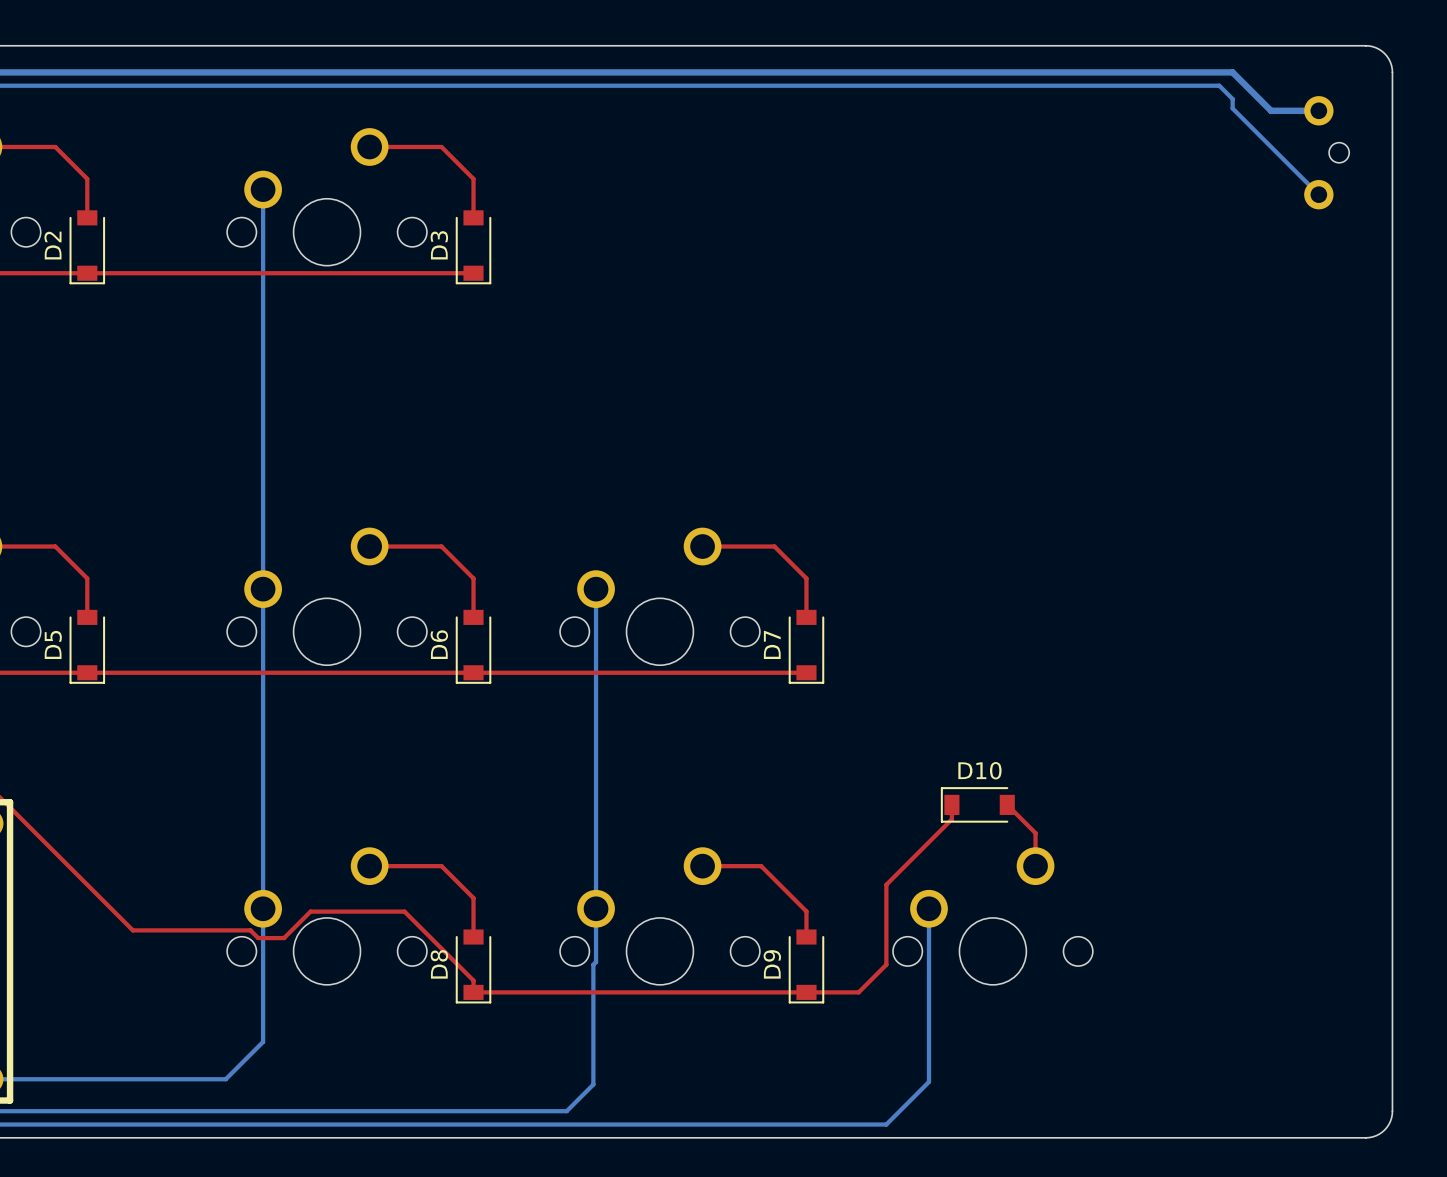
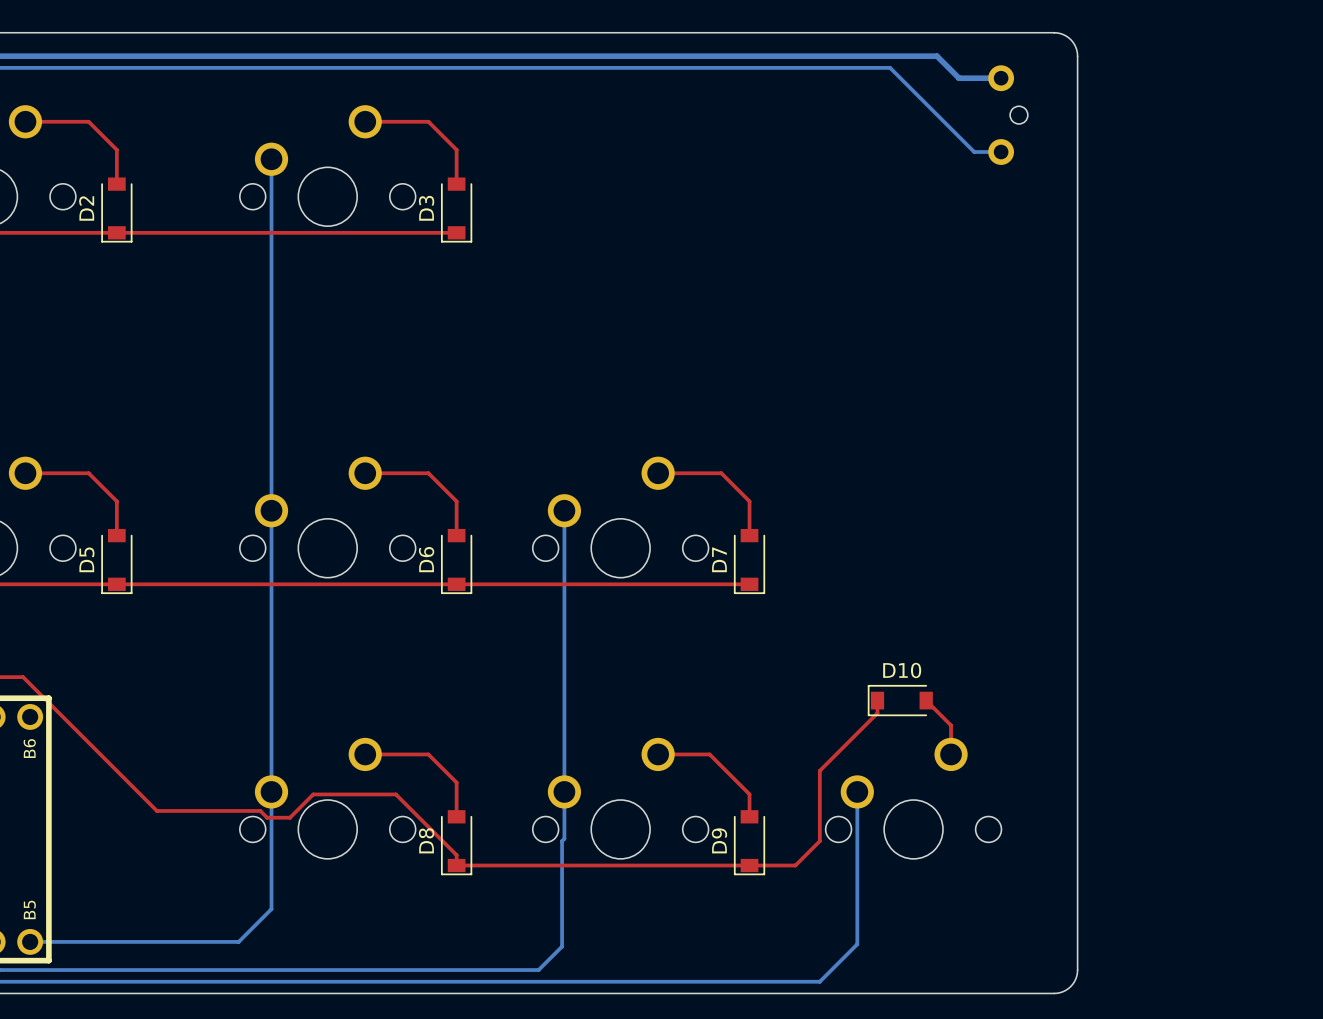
board edge: (1152, 45) (1369, 46) (1379, 49) (1386, 56) (1392, 72) (1391, 1118) (1382, 1132) (1369, 1137) (1152, 1137) -> (1054, 32) (1063, 34) (1070, 39) (1075, 47) (1077, 56) (1077, 970) (1075, 979) (1070, 986) (1063, 991) (1054, 993)
bottom track: (1019, 72) (1232, 72) (1271, 110) (1318, 110) -> (936, 56) (959, 78) (1001, 78)
bottom track: (966, 85) (1219, 85) (1232, 99) (1232, 108) (1318, 194) -> (890, 67) (974, 152) (1001, 152)
part position: (1326, 152) -> (1008, 115)

